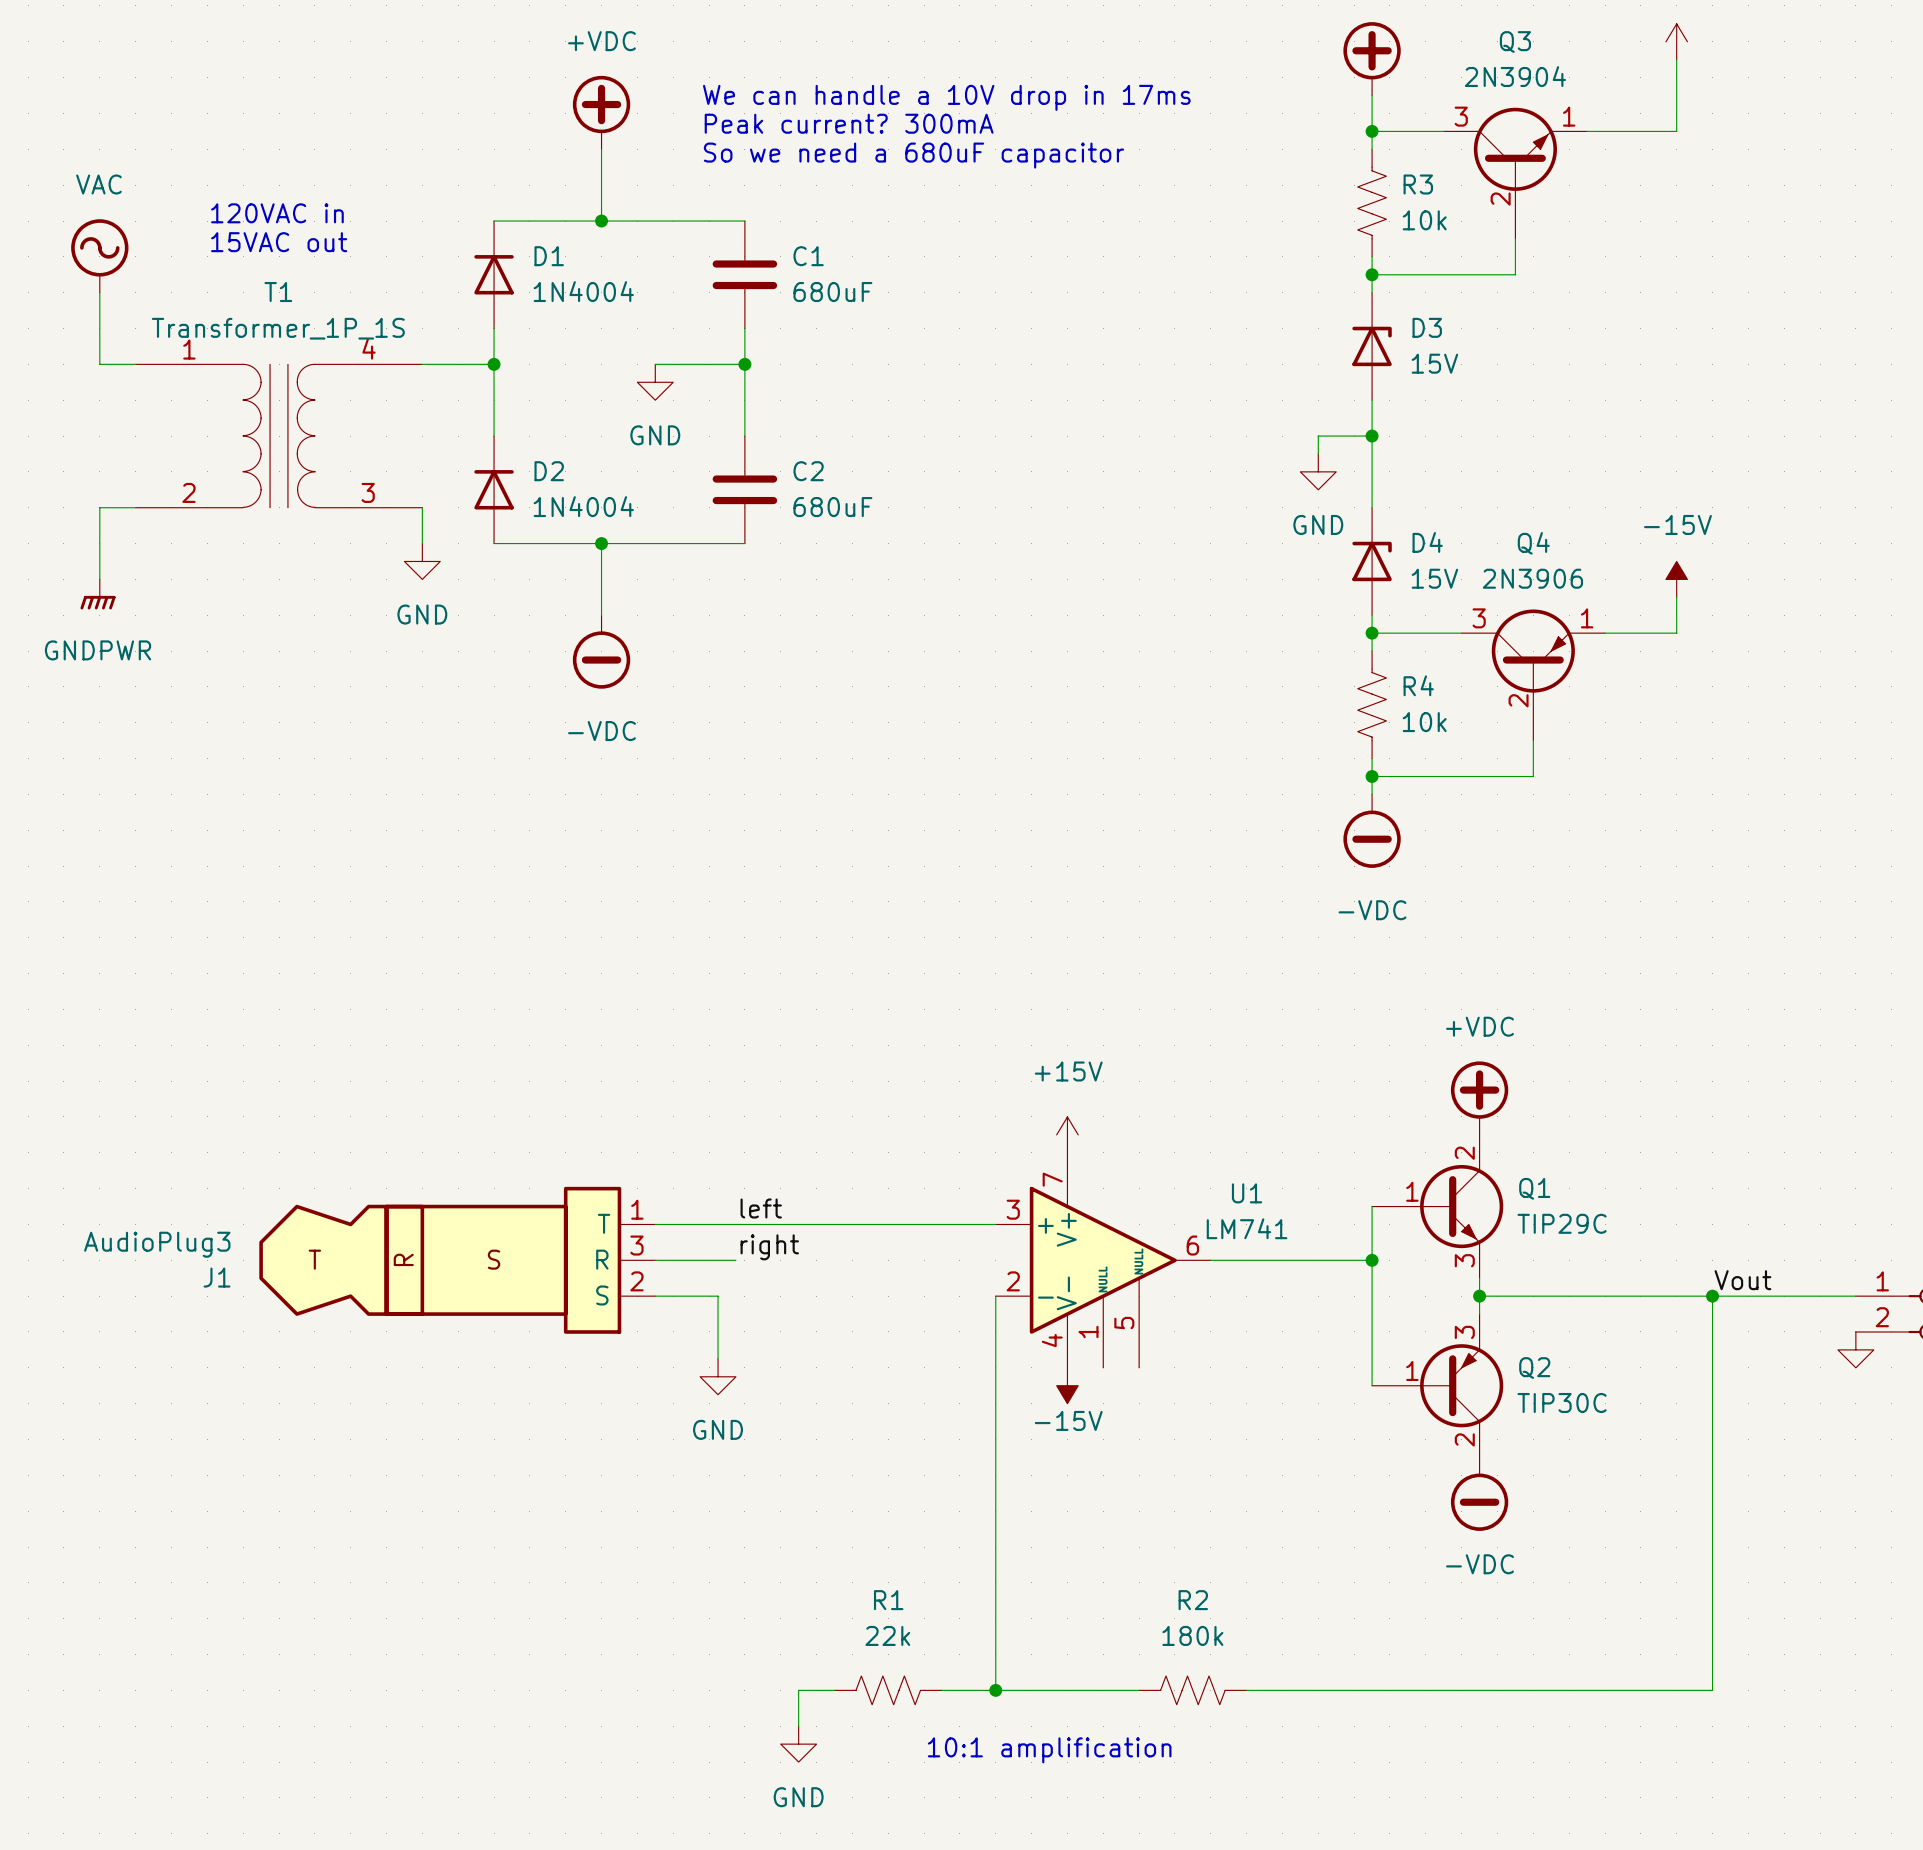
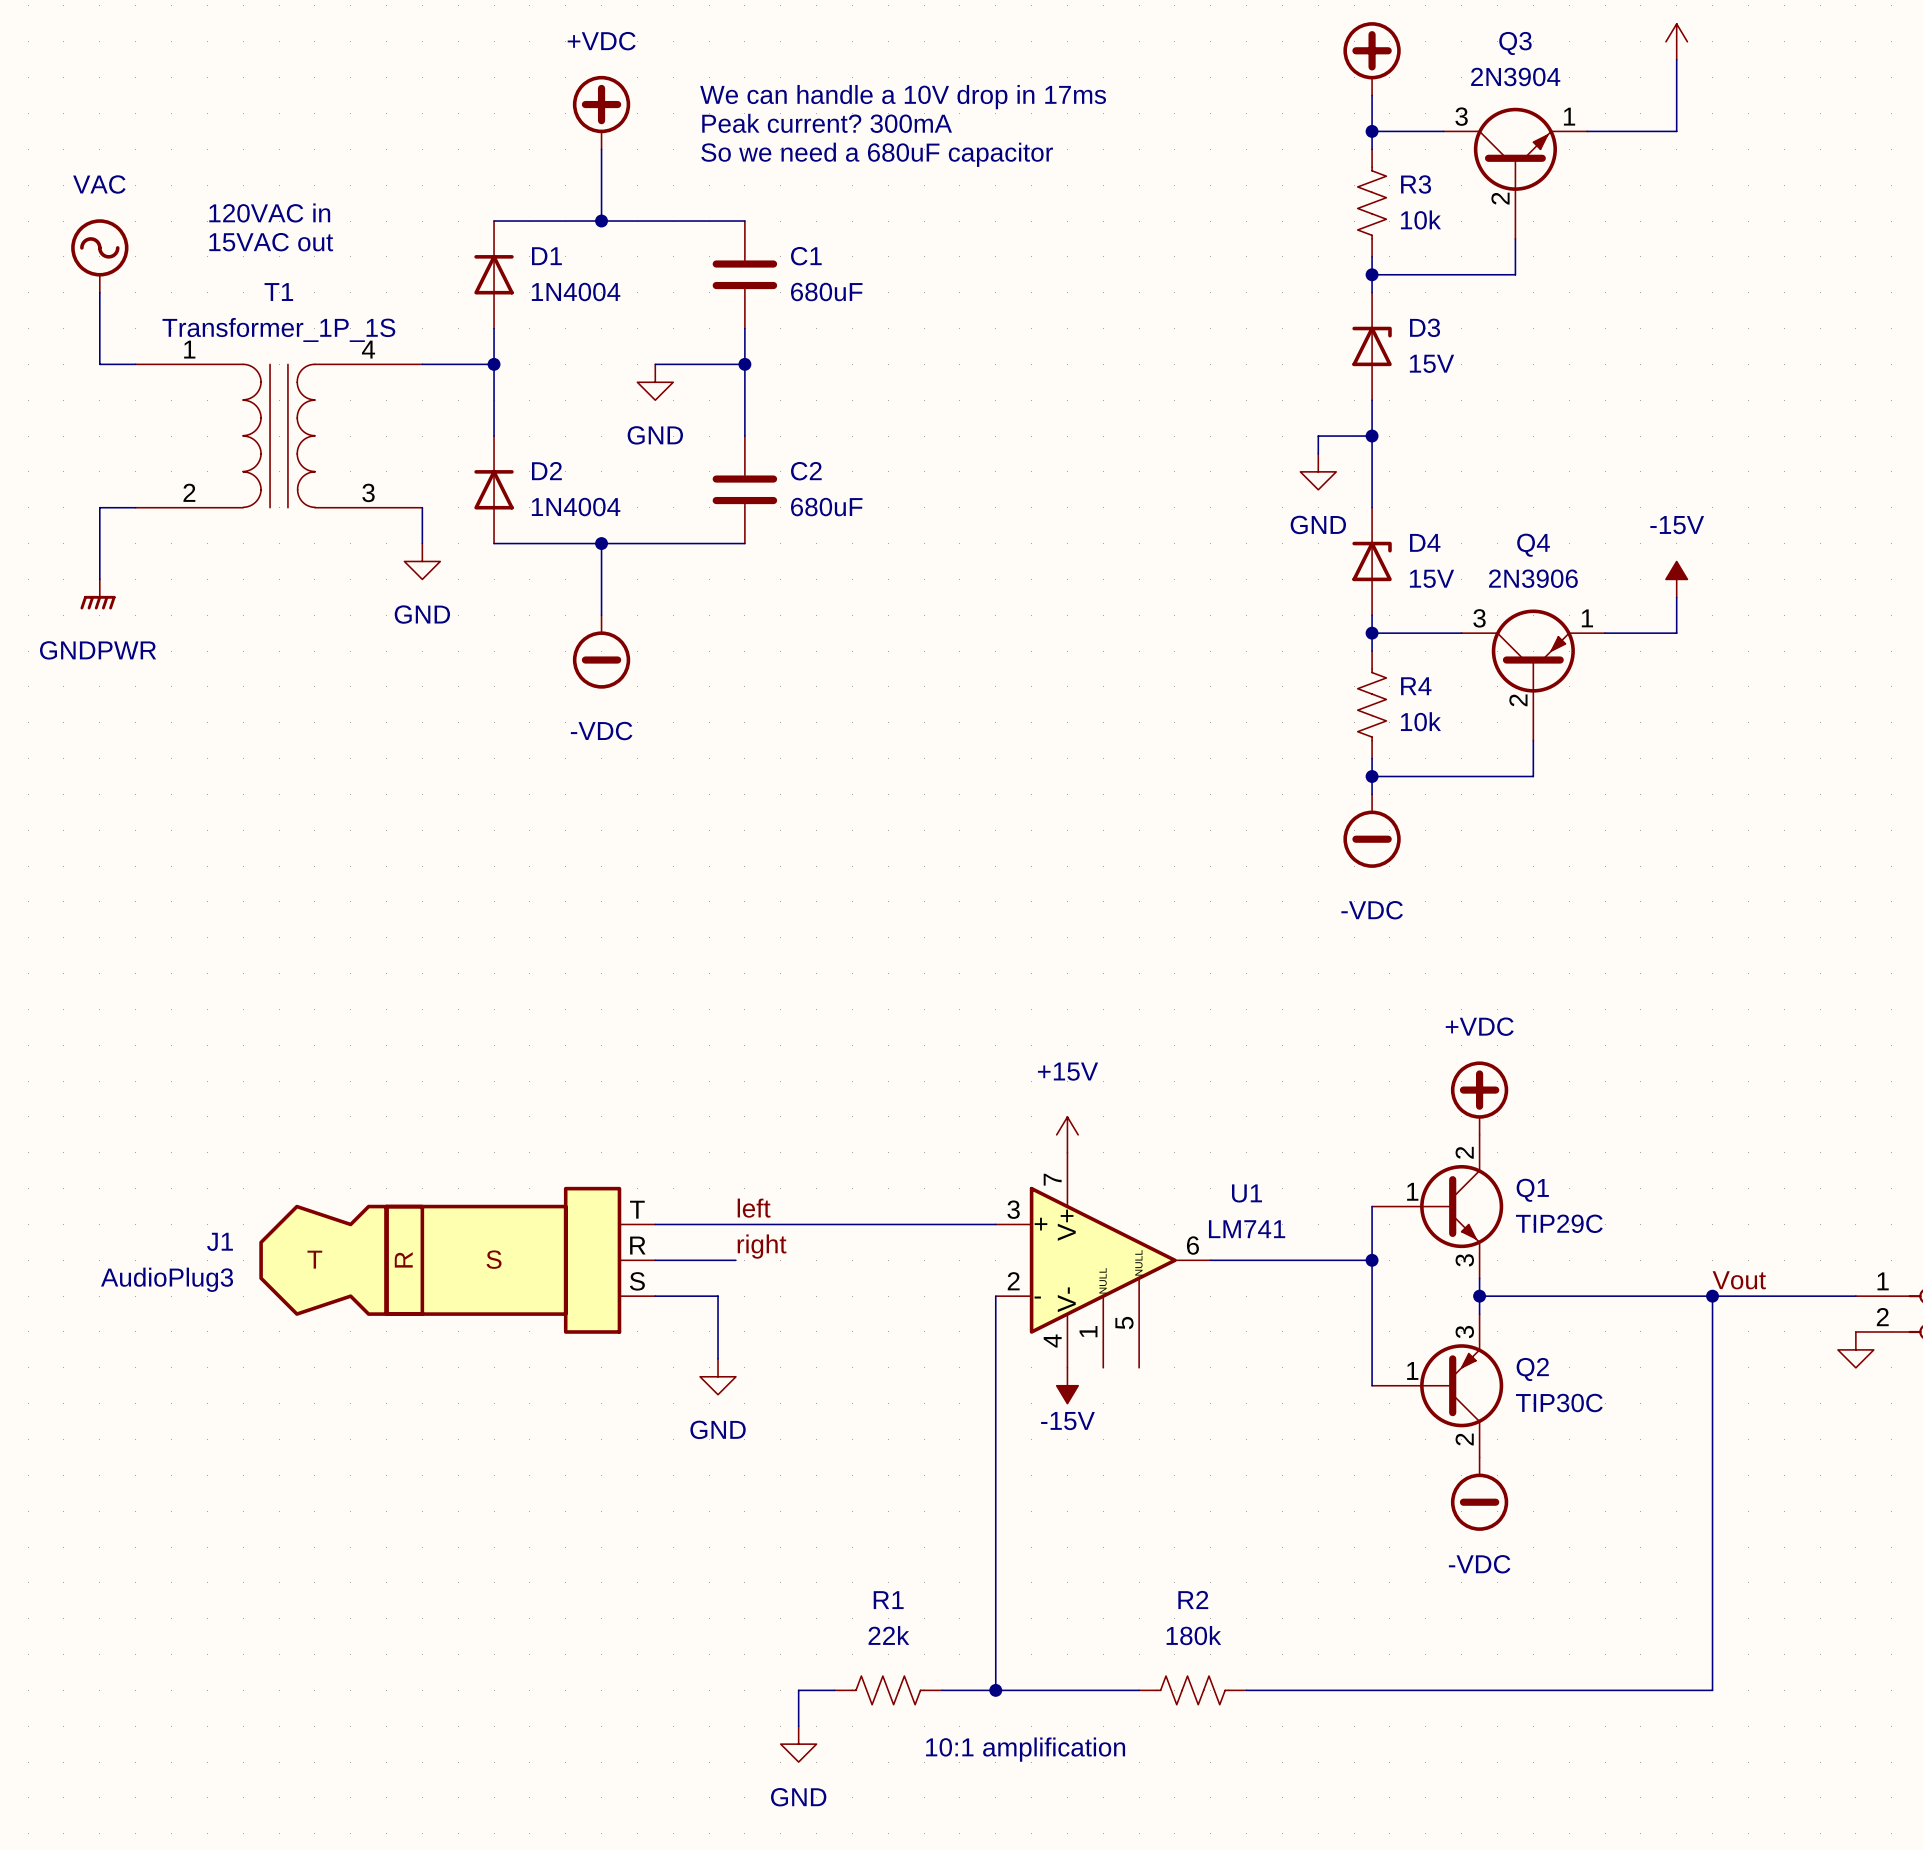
J1 pin number: 1 (637, 1209) -> T (637, 1209)
J1 pin name: T (604, 1223) -> none
J1 value position: AudioPlug3 (157, 1244) -> AudioPlug3 (167, 1279)
J1 pin number: 3 (636, 1245) -> R (637, 1245)
J1 pin name: R (602, 1259) -> none
J1 name position: J1 (217, 1277) -> J1 (220, 1241)
J1 pin number: 2 (636, 1281) -> S (637, 1281)
J1 pin name: S (602, 1295) -> none

